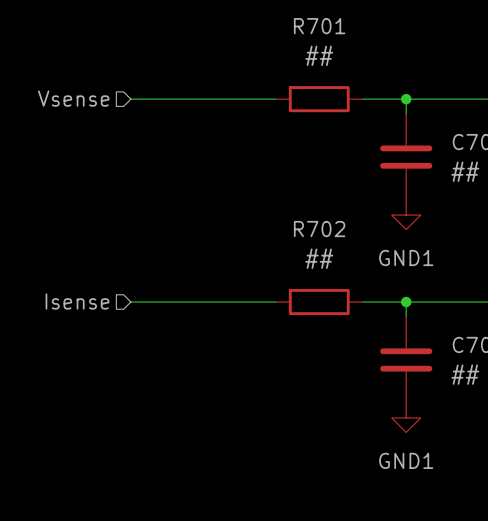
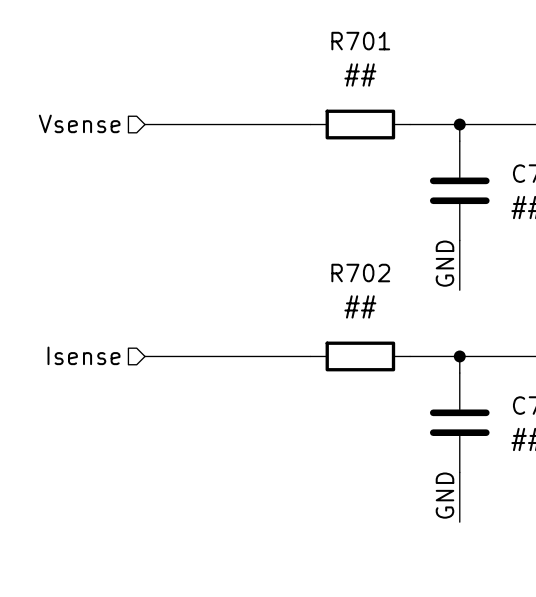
wire: none -> (459, 240) (459, 290)
power symbol: GND1 (406, 215) -> none
label: none -> GND (444, 263)
wire: none -> (459, 472) (459, 522)
power symbol: GND1 (406, 417) -> none
label: none -> GND (444, 495)

